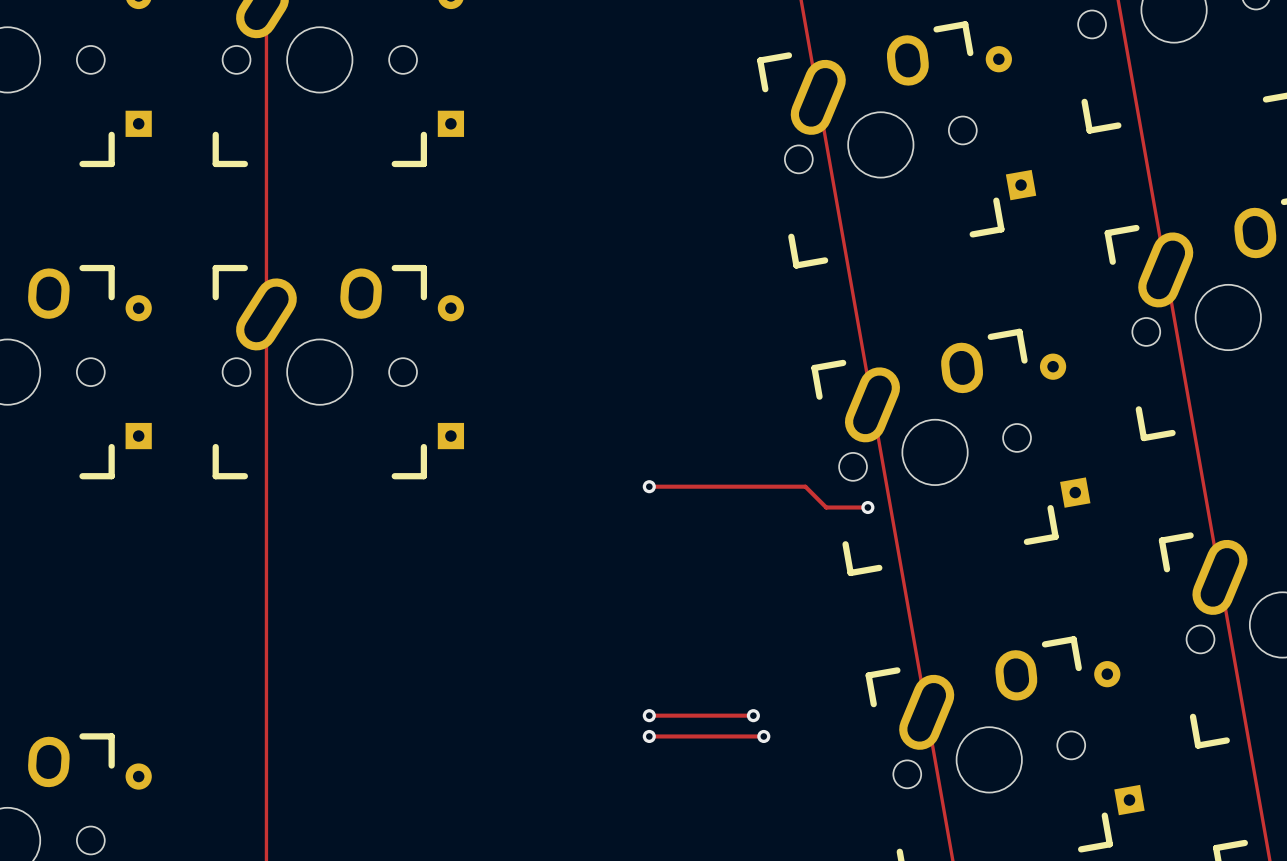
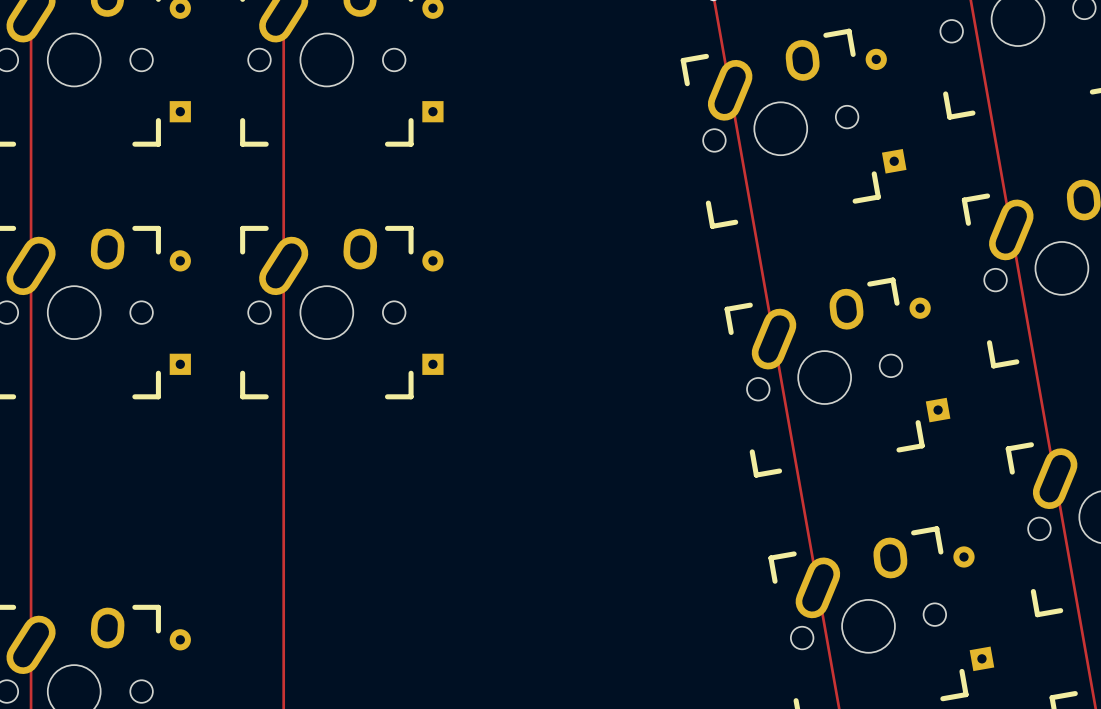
track: (649, 486) (805, 486) (826, 507) (867, 507) -> none
via: (649, 486) -> none
via: (867, 507) -> none
track: (649, 715) (753, 715) -> none
via: (649, 715) -> none
via: (753, 715) -> none
track: (649, 736) (763, 736) -> none
via: (649, 736) -> none
via: (763, 736) -> none

